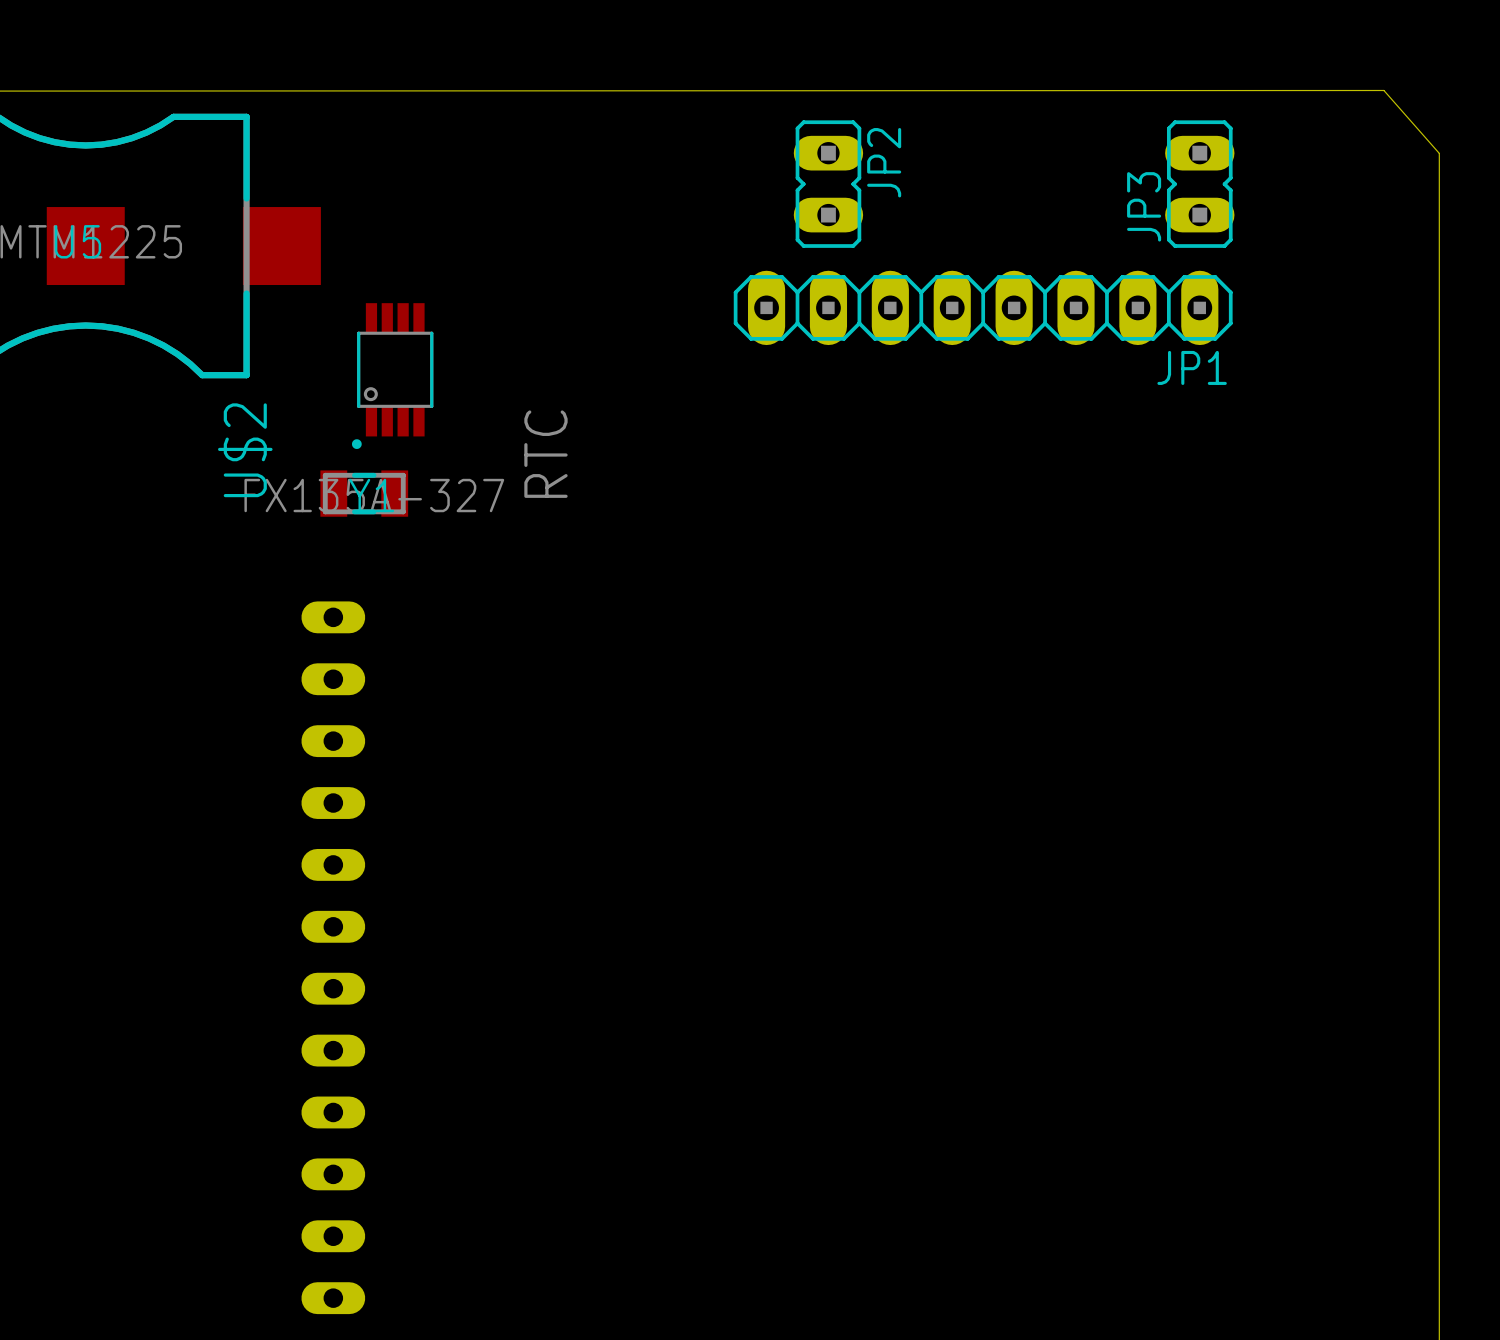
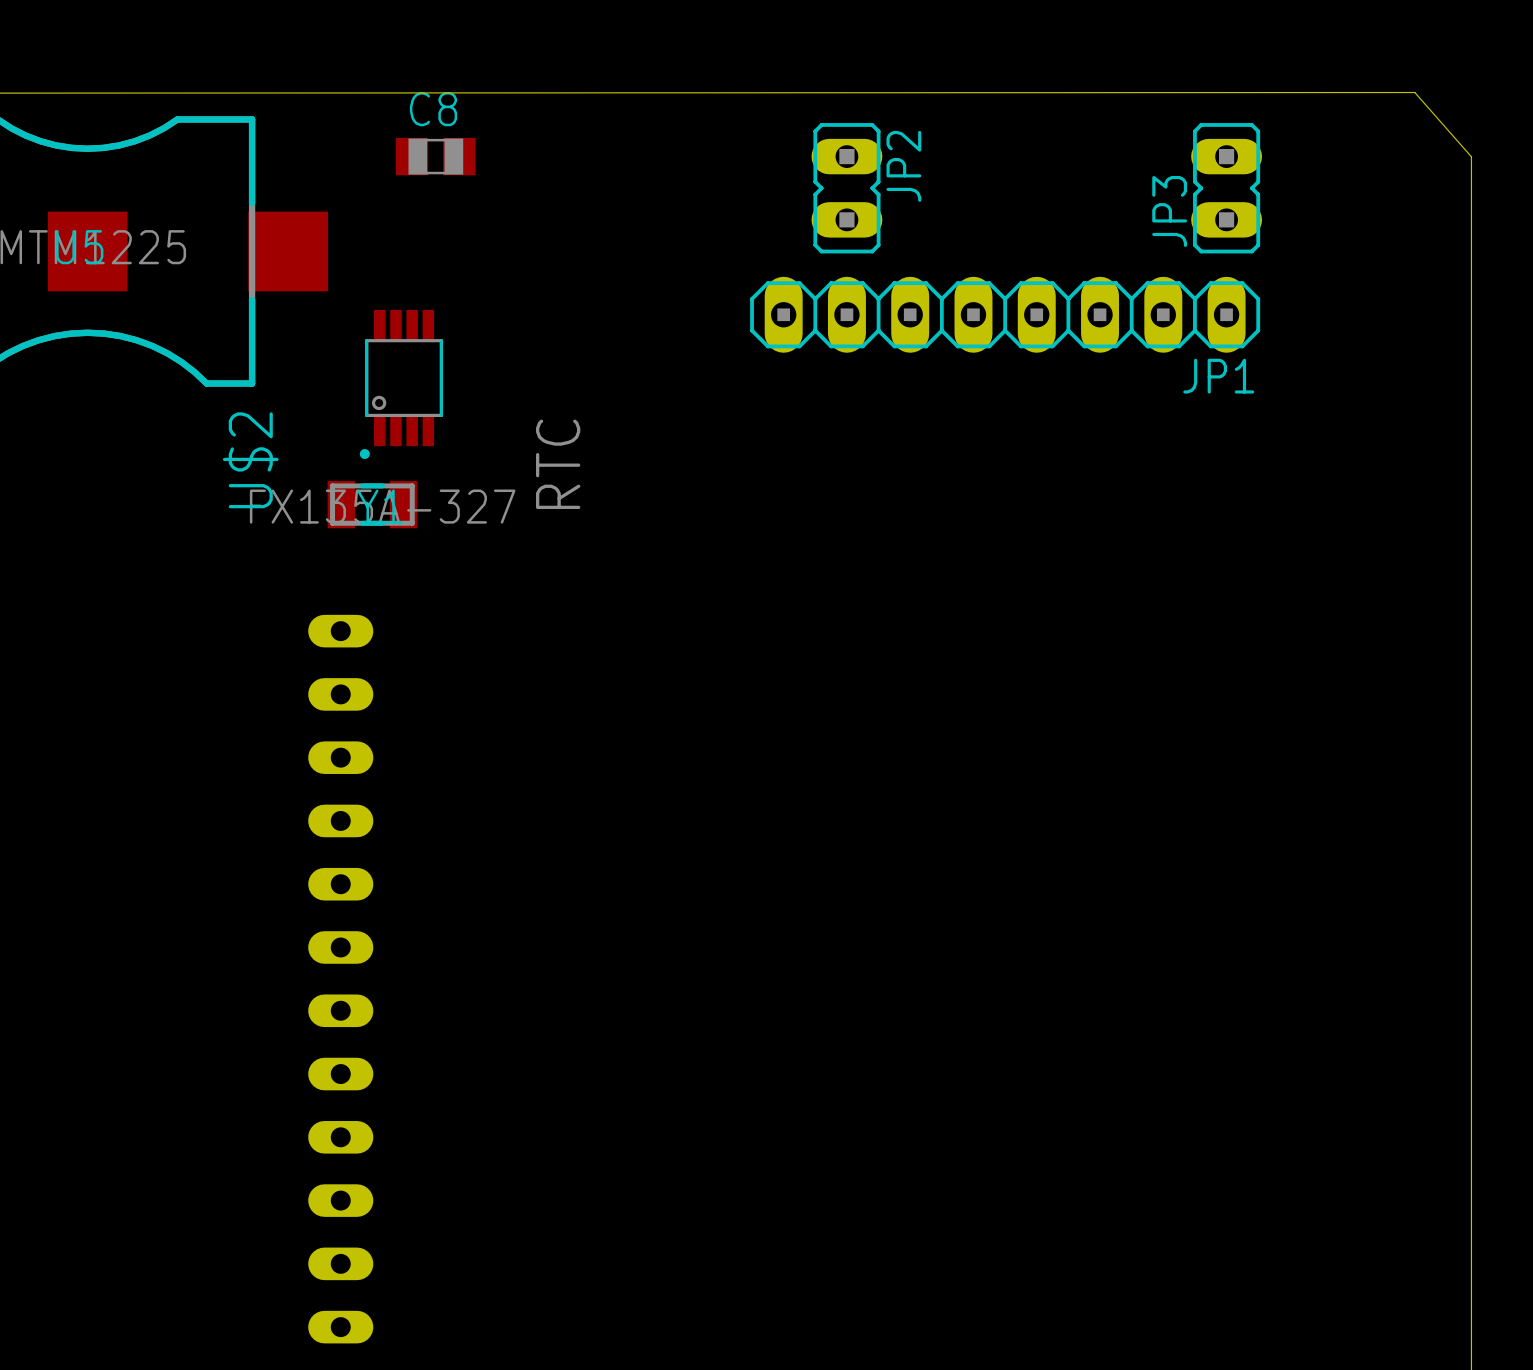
C8: none -> (435, 156)

